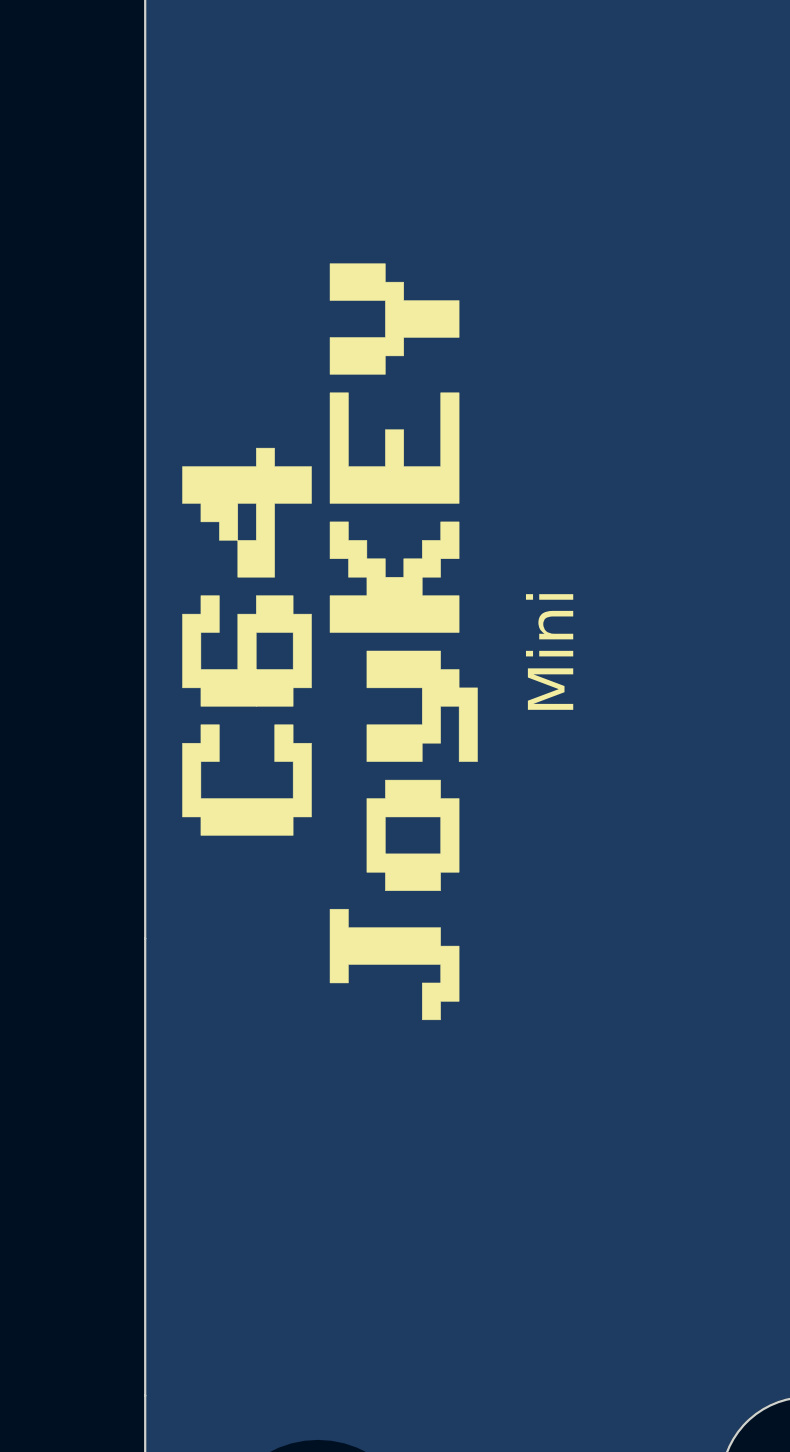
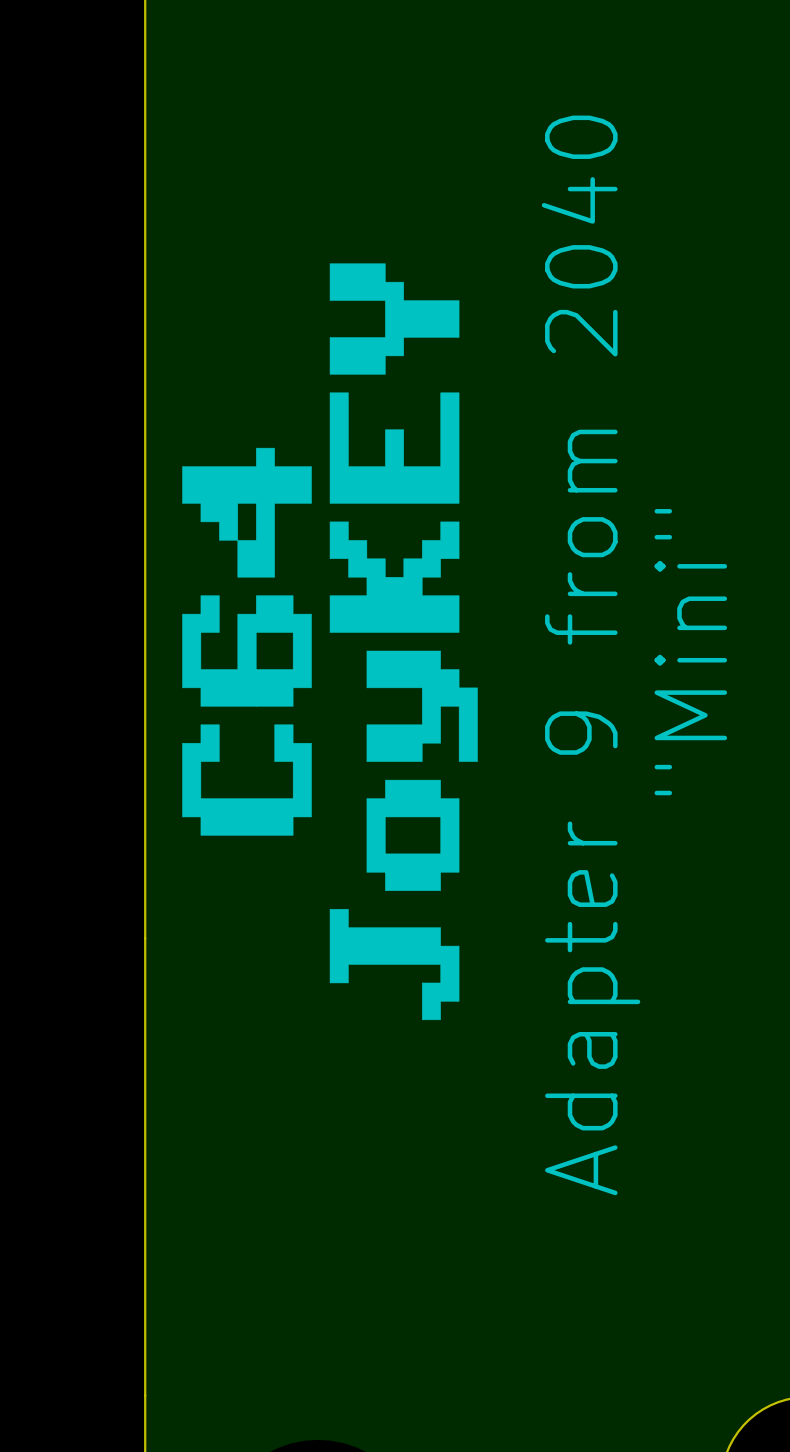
text: Mini (549, 652) -> Adapter 9 from 2040 (591, 655)
text: none -> "Mini" (690, 652)

